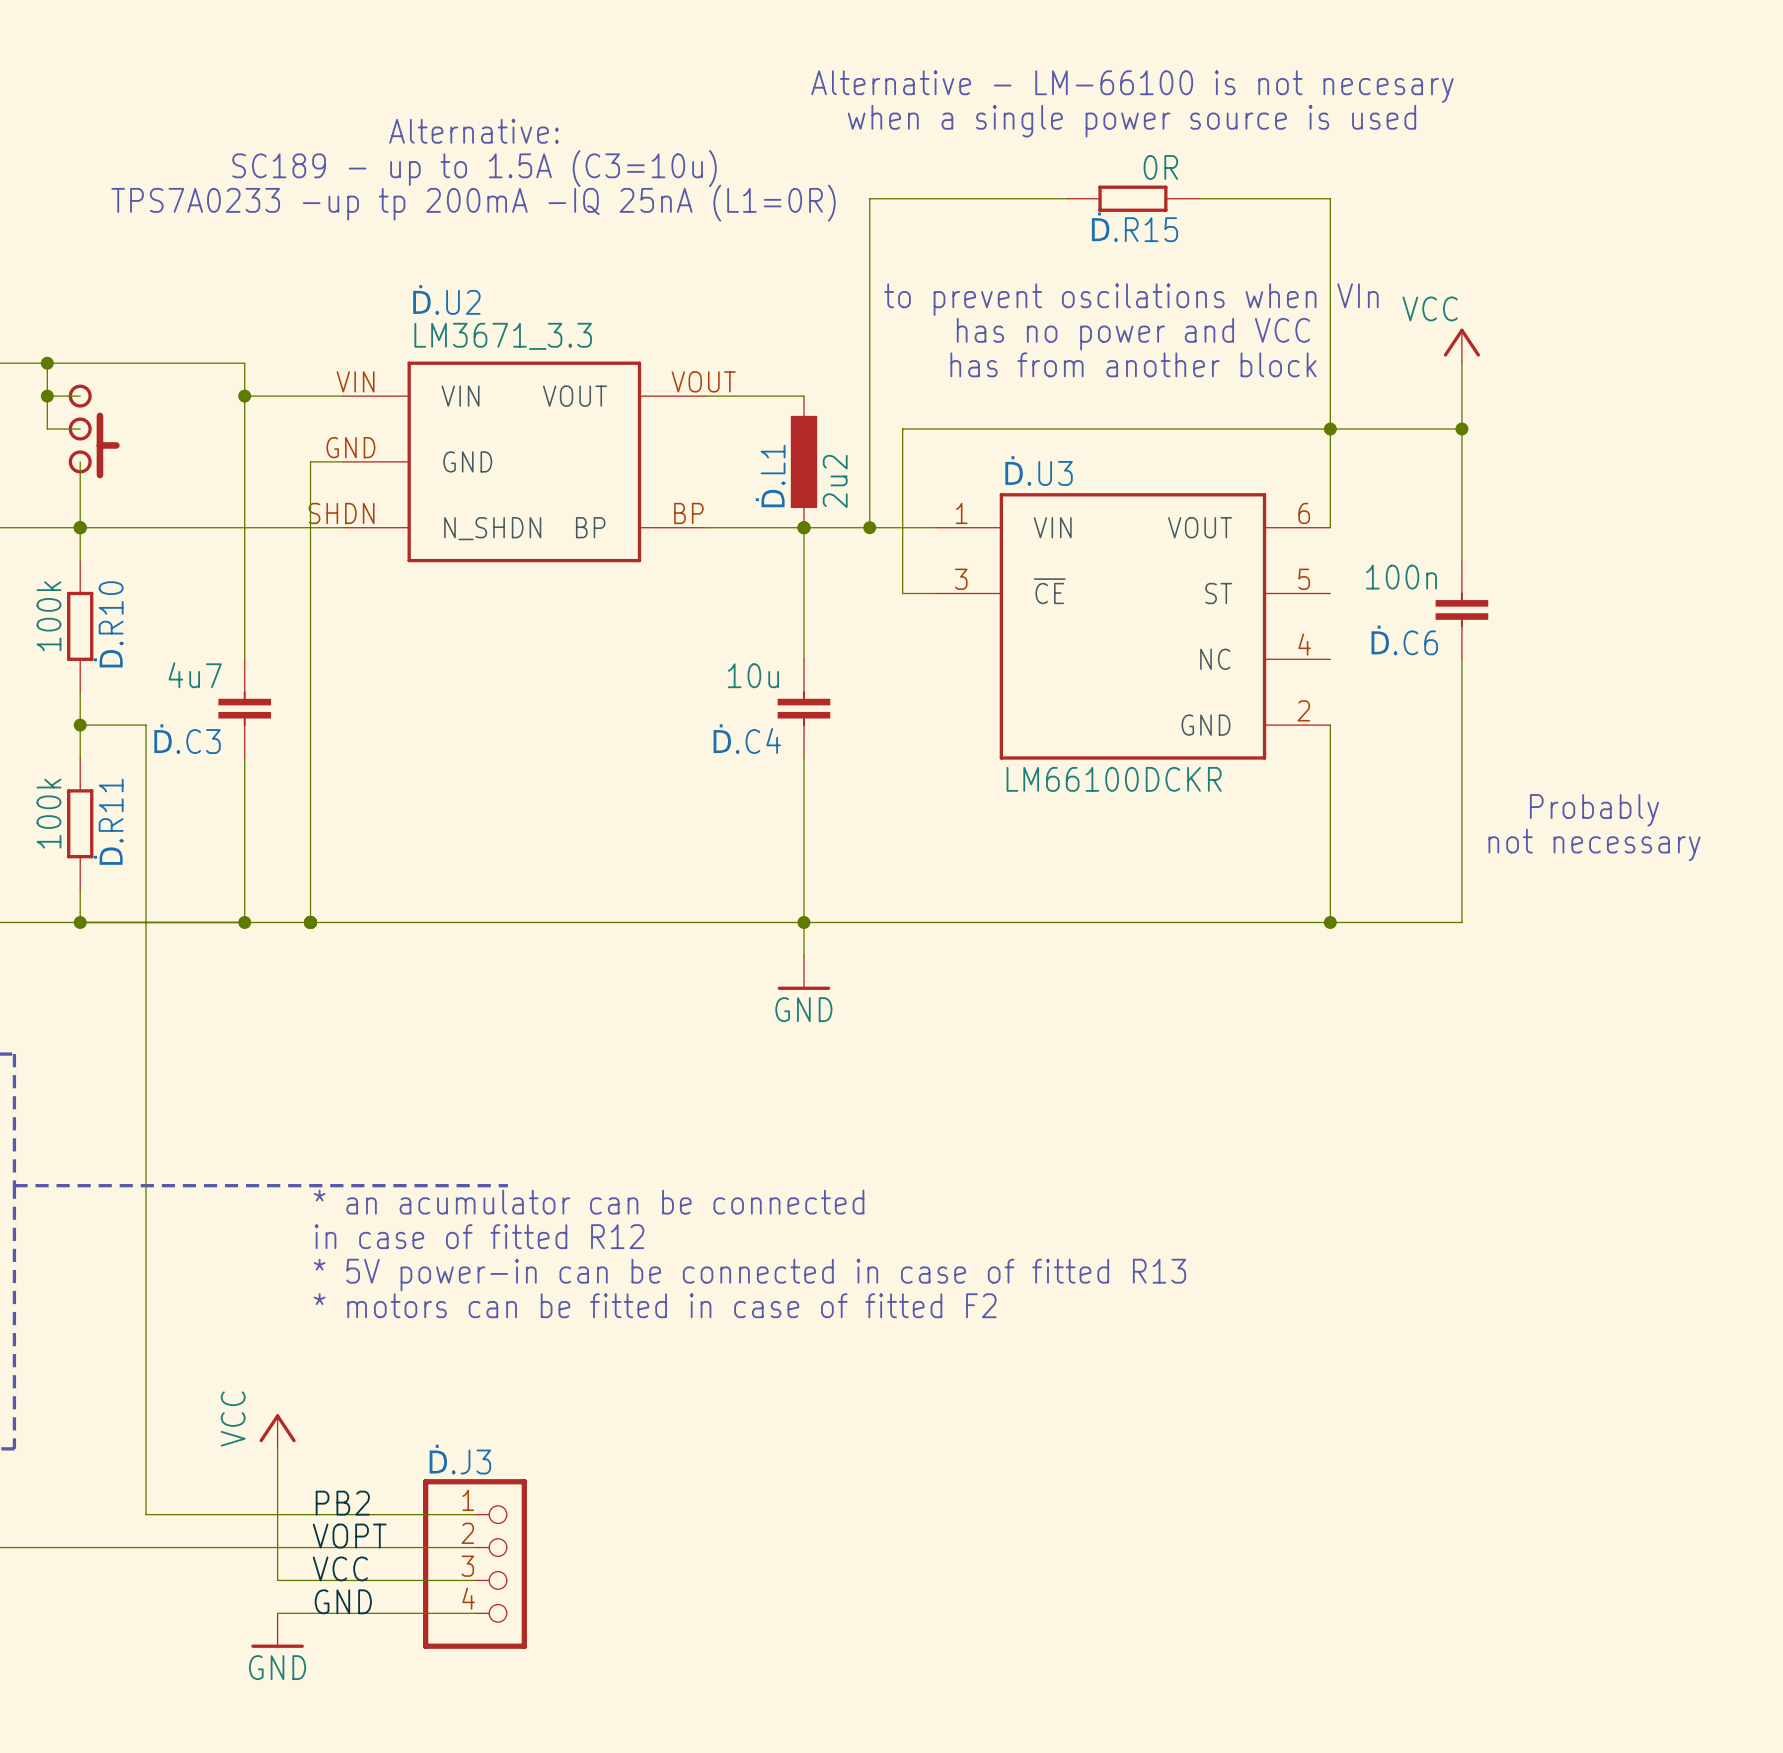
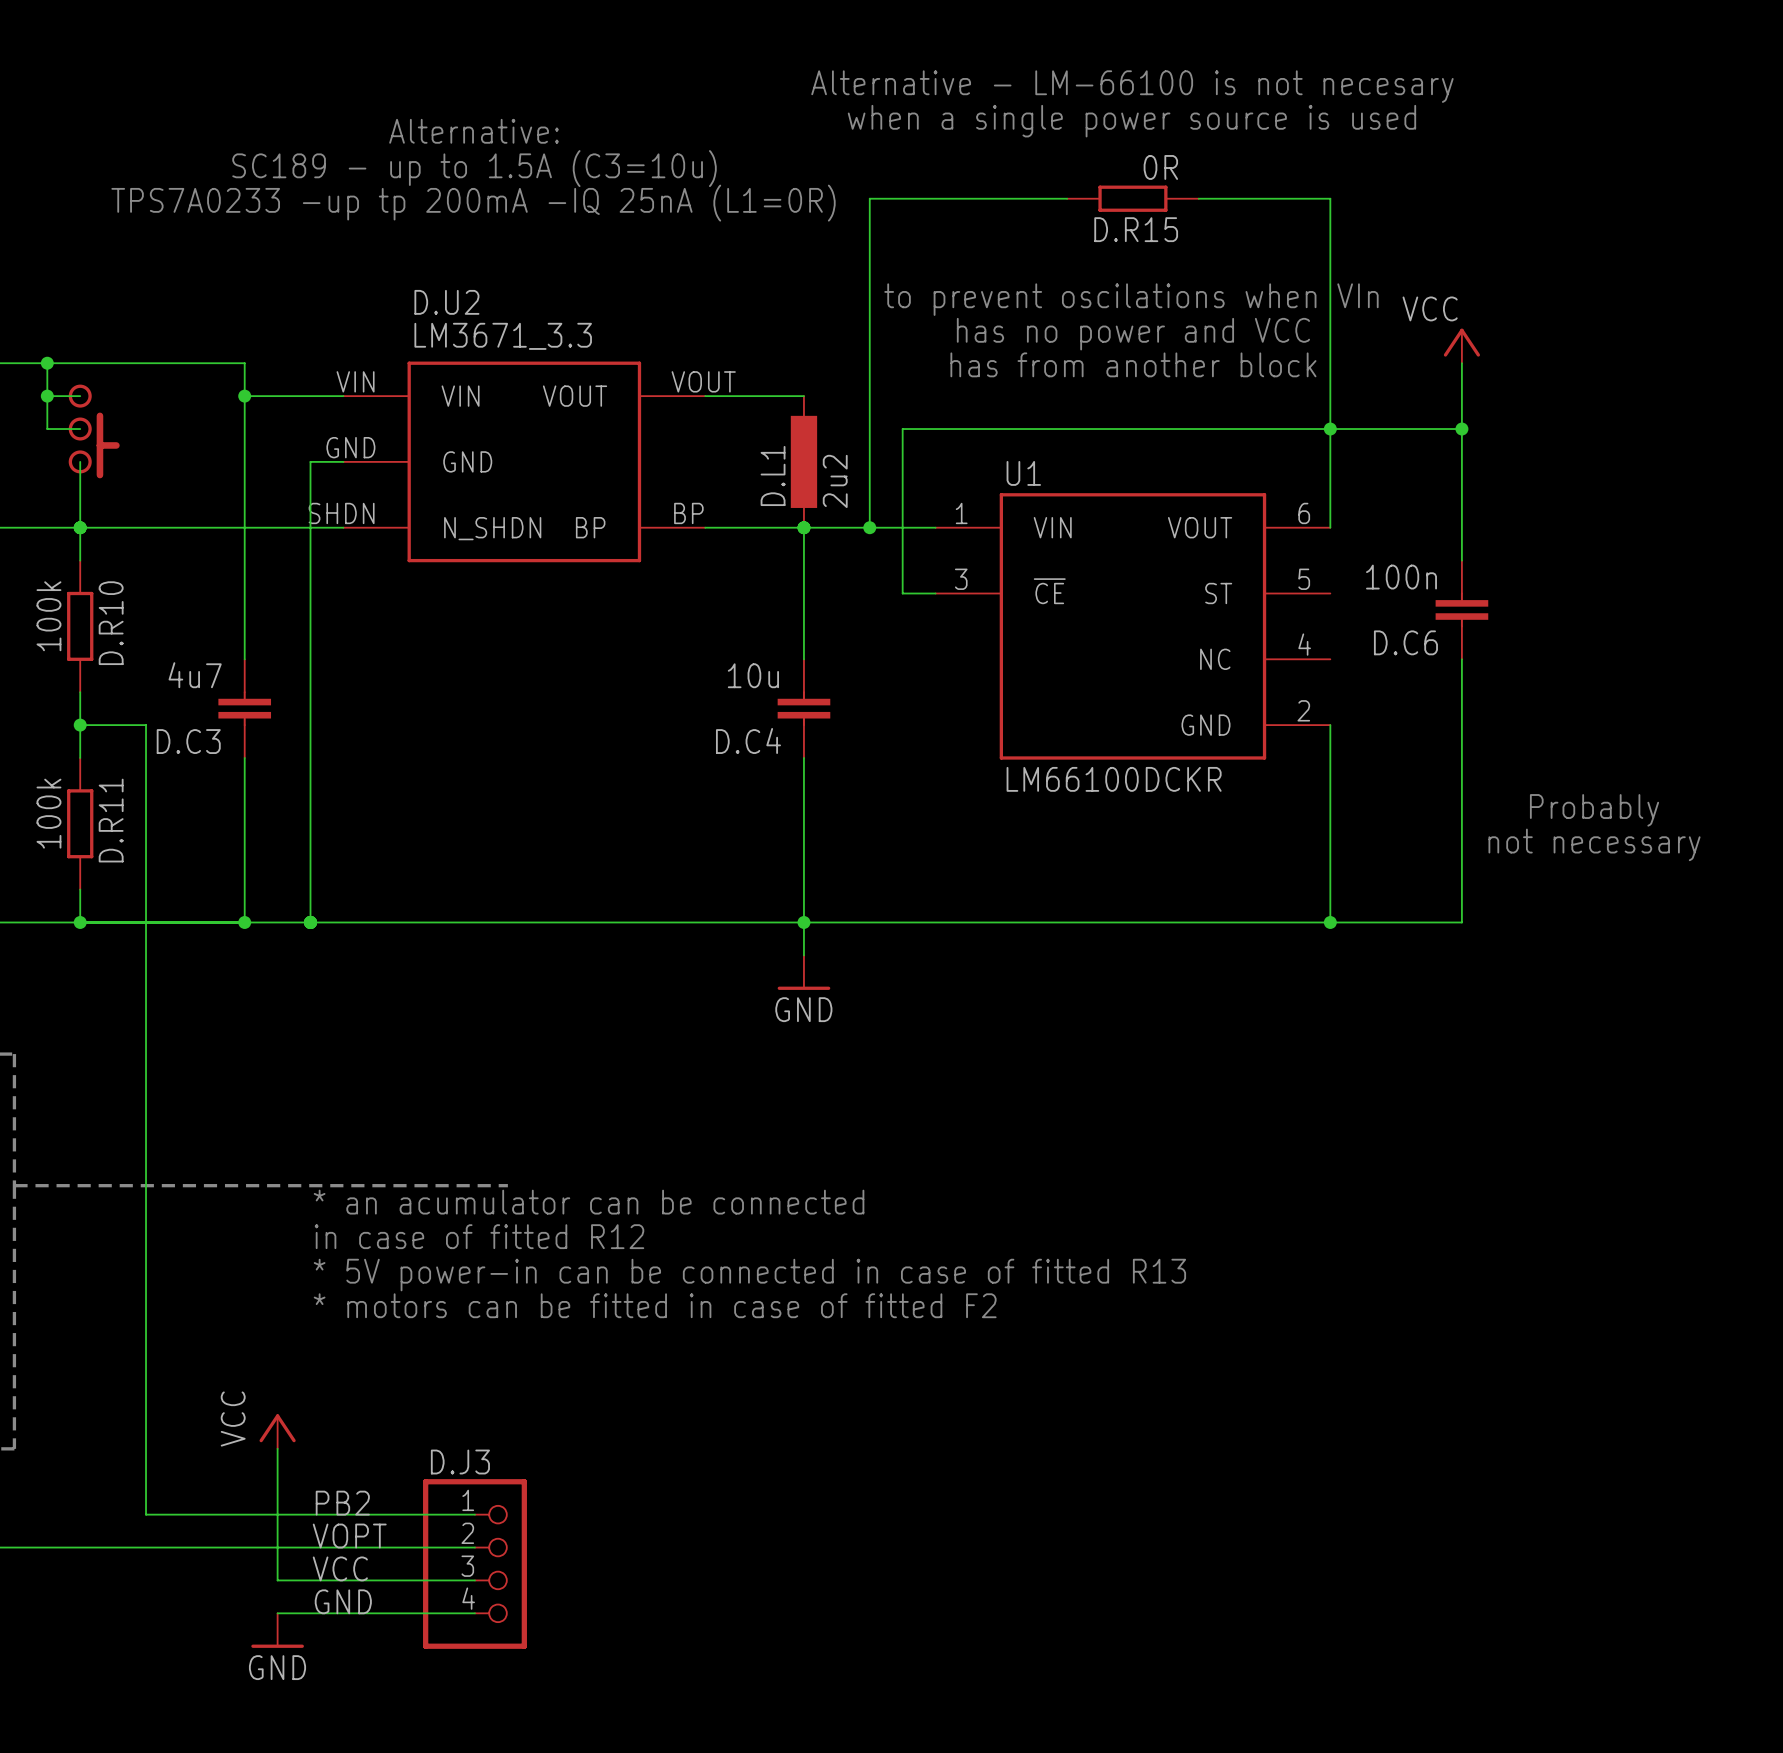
Ḋ.R15 name: Ḋ.R15 (1134, 226) -> D.R15 (1136, 229)
Ḋ.U2 name: Ḋ.U2 (446, 299) -> D.U2 (446, 302)
Ḋ.U3 name: Ḋ.U3 (1038, 470) -> U1 (1023, 473)
Ḋ.L1 name: Ḋ.L1 (770, 476) -> D.L1 (773, 475)
Ḋ.R10 name: Ḋ.R10 (108, 624) -> D.R10 (111, 623)
Ḋ.C6 name: Ḋ.C6 (1404, 639) -> D.C6 (1405, 642)
Ḋ.C3 name: Ḋ.C3 (187, 738) -> D.C3 (188, 741)
Ḋ.C4 name: Ḋ.C4 (746, 738) -> D.C4 (748, 740)
Ḋ.R11 name: Ḋ.R11 (108, 822) -> D.R11 (111, 820)
Ḋ.J3 name: Ḋ.J3 (459, 1459) -> D.J3 (460, 1462)

